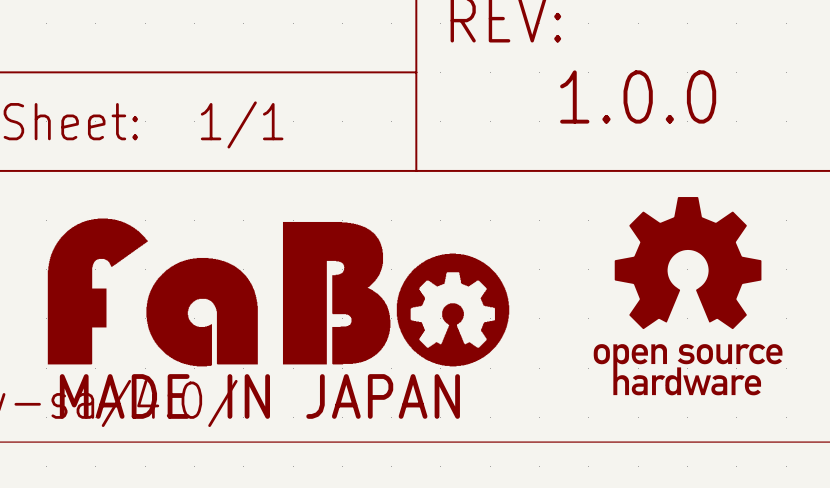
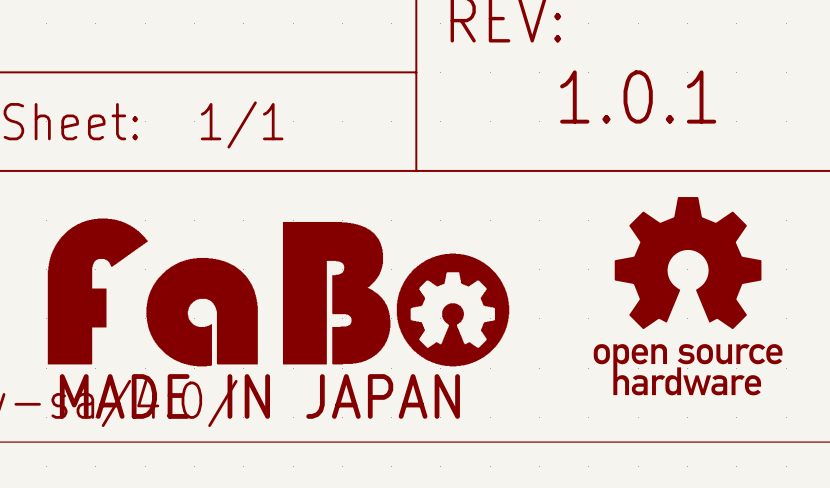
text: 1.0.0 (638, 97) -> 1.0.1 (638, 97)

